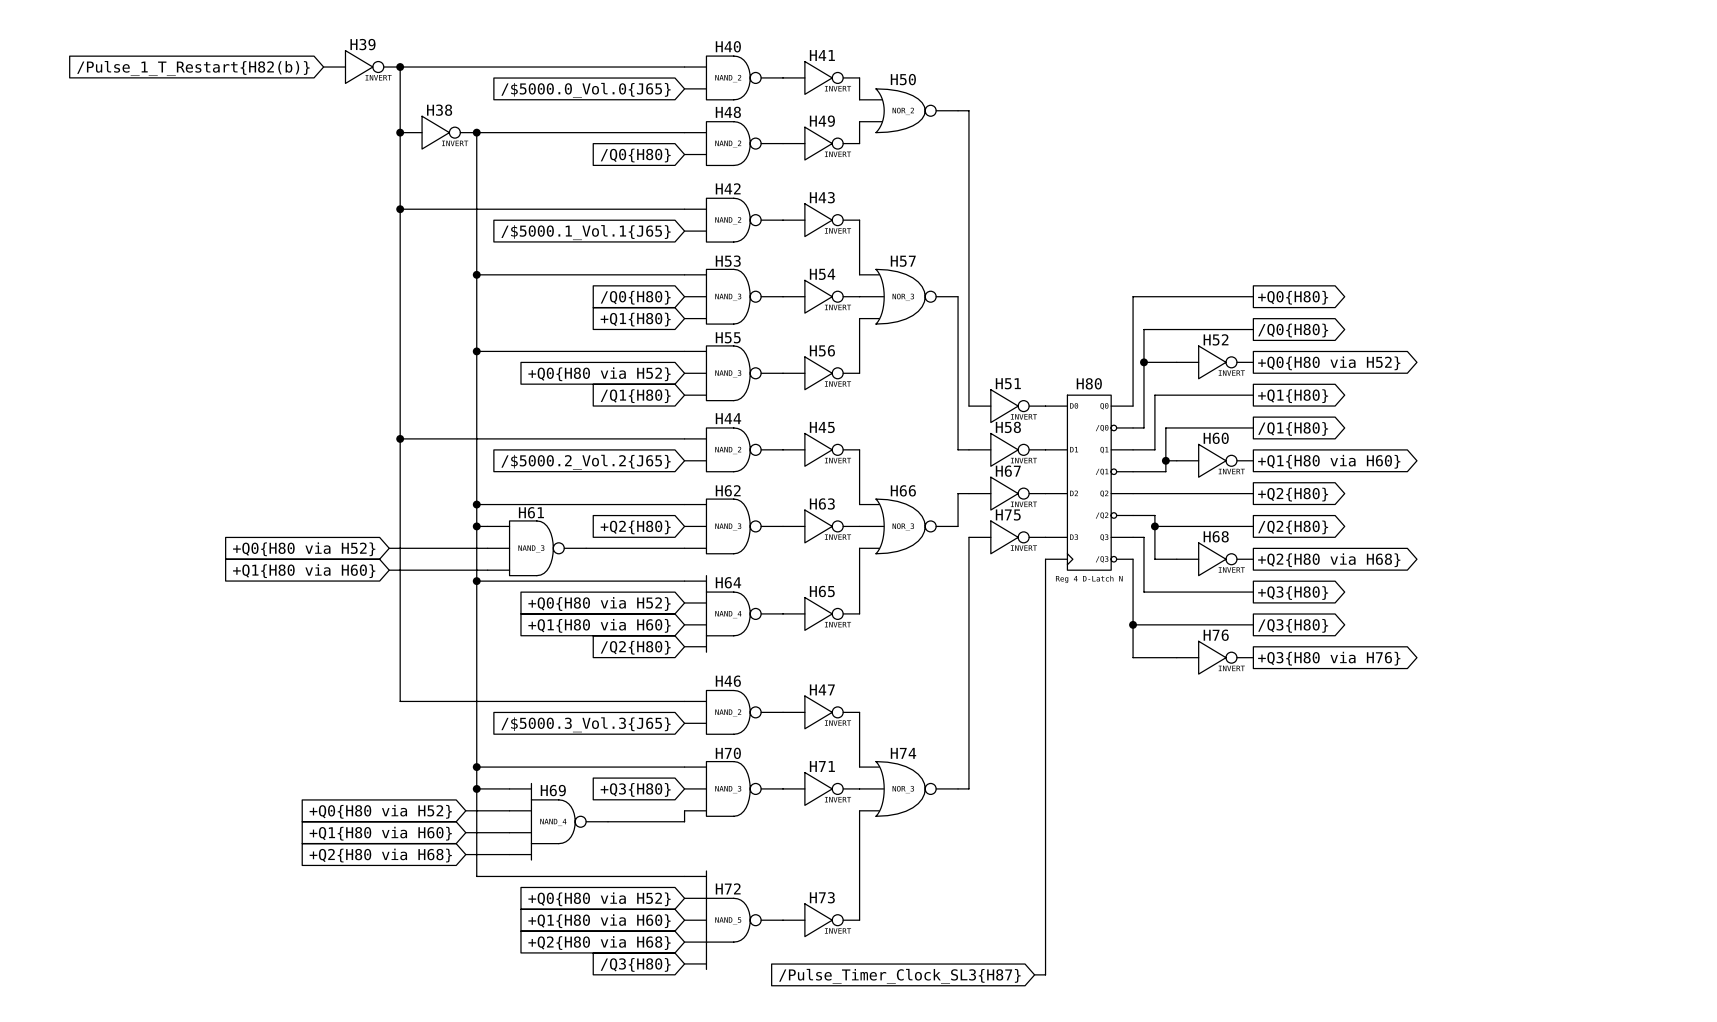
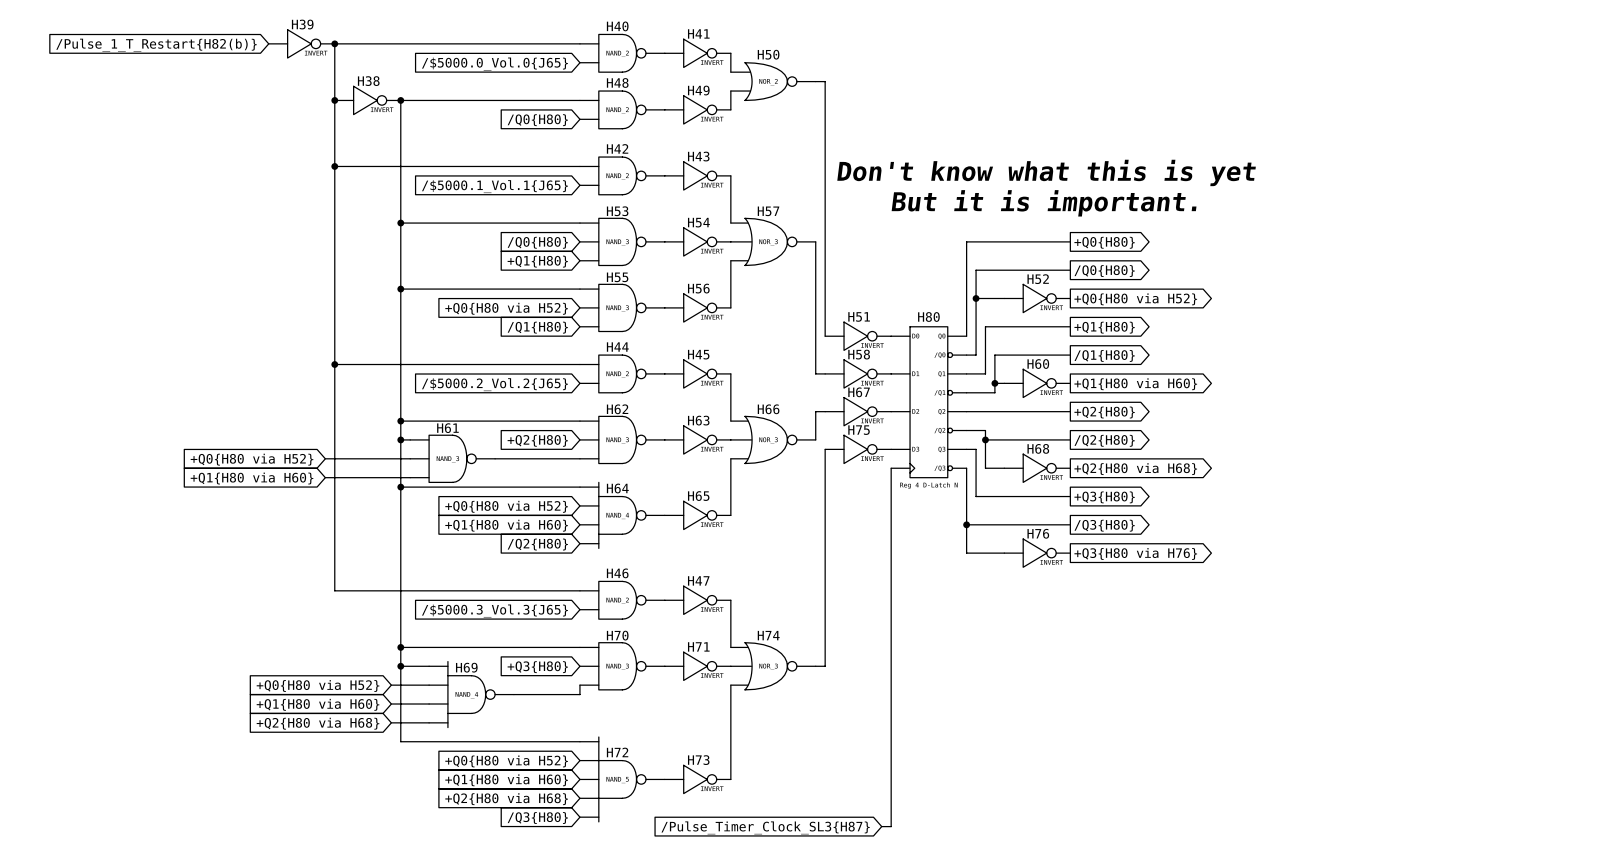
text: none -> Don't know what this is yet (1046, 172)
text: none -> But it is important. (1044, 203)

